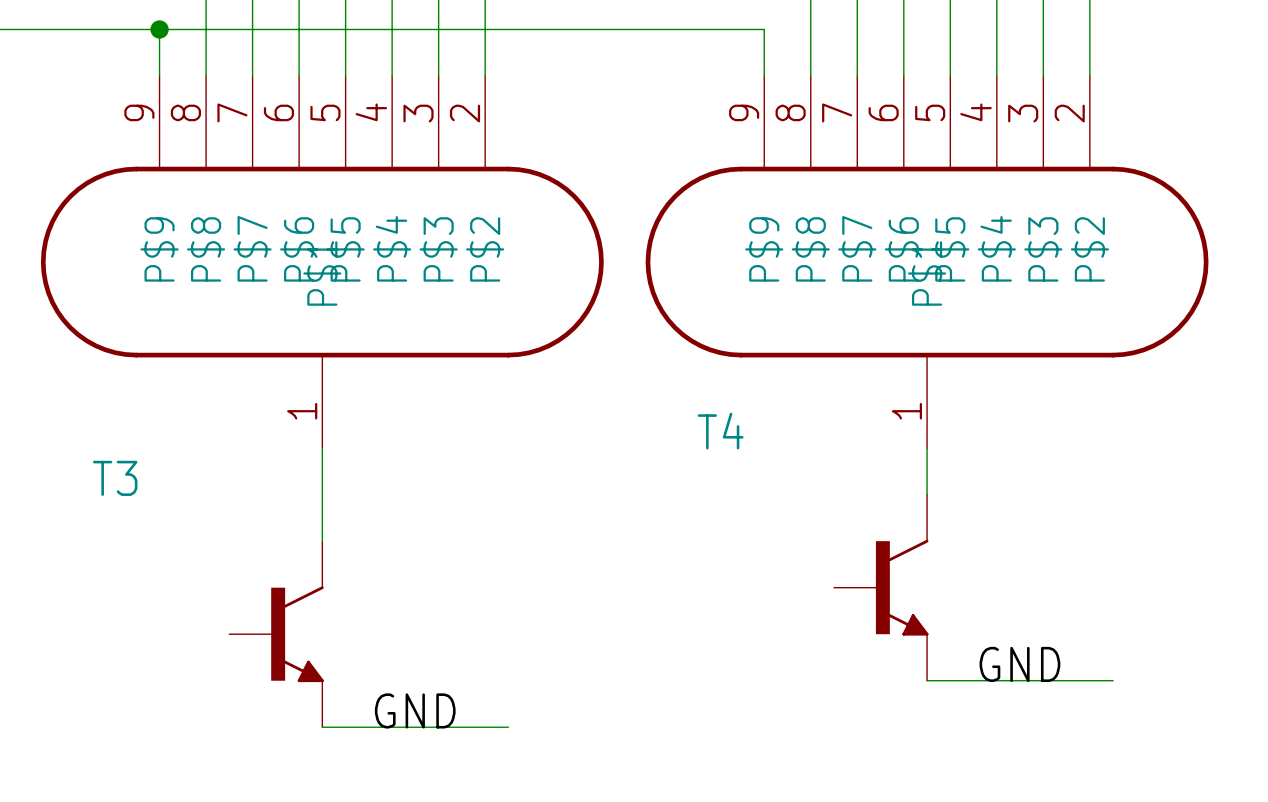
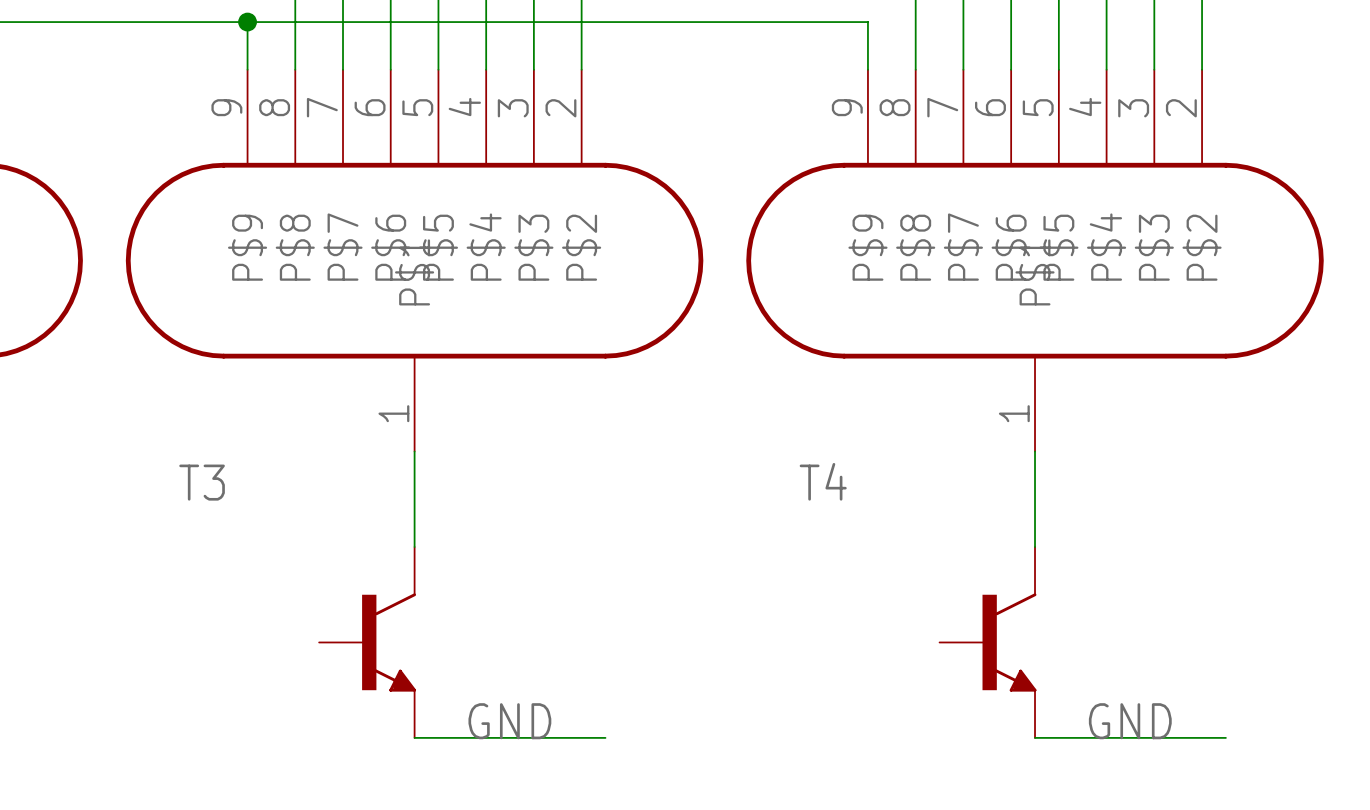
T4 position: (881, 587) -> (988, 642)
label position: GND (1019, 664) -> GND (1130, 721)
wire: (927, 680) (1113, 680) -> (1035, 737) (1225, 737)

